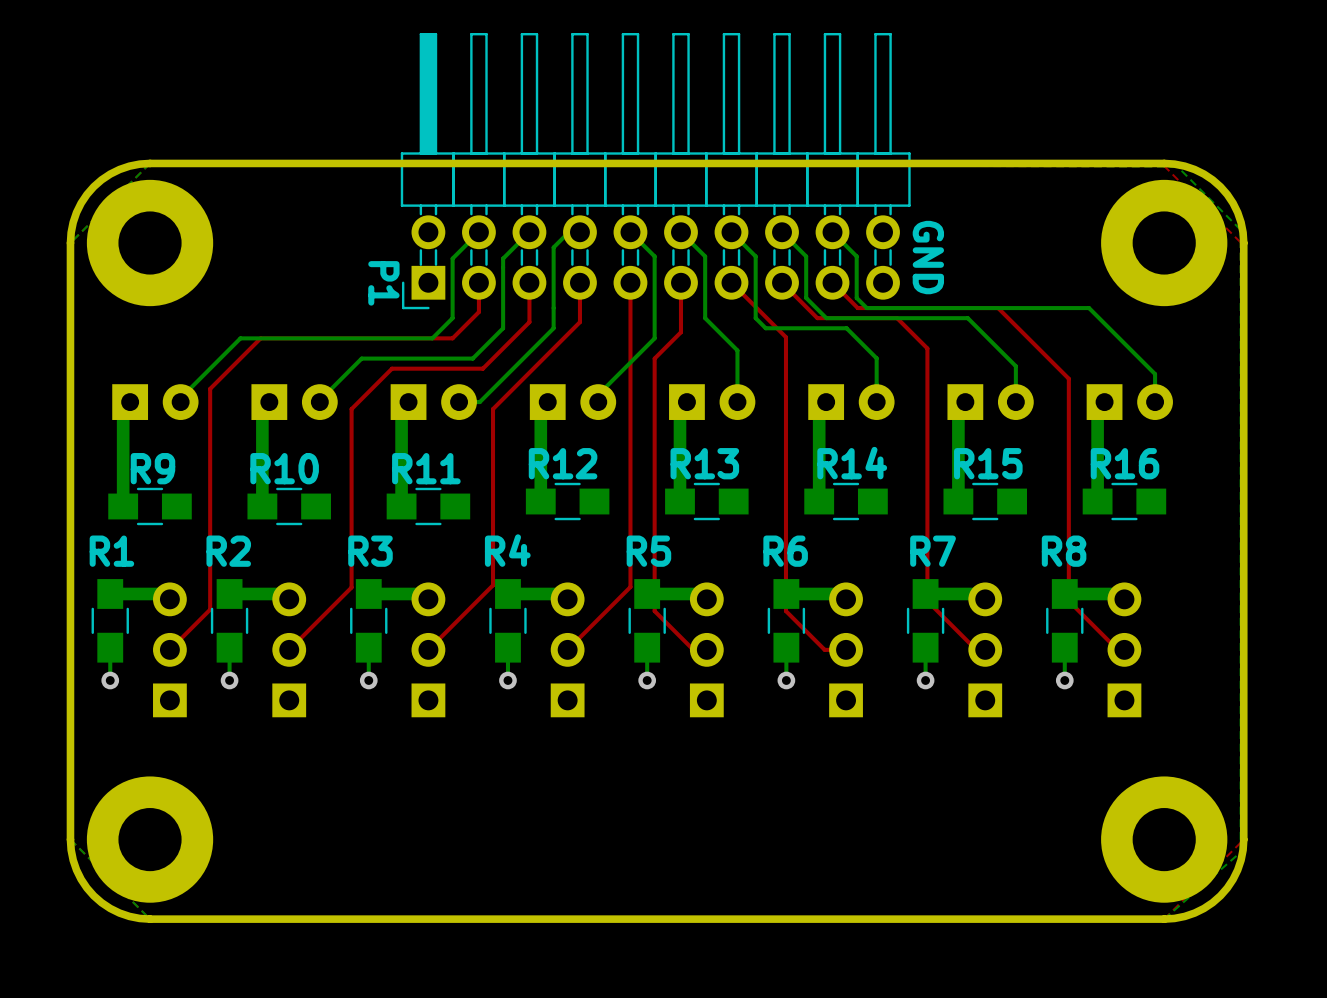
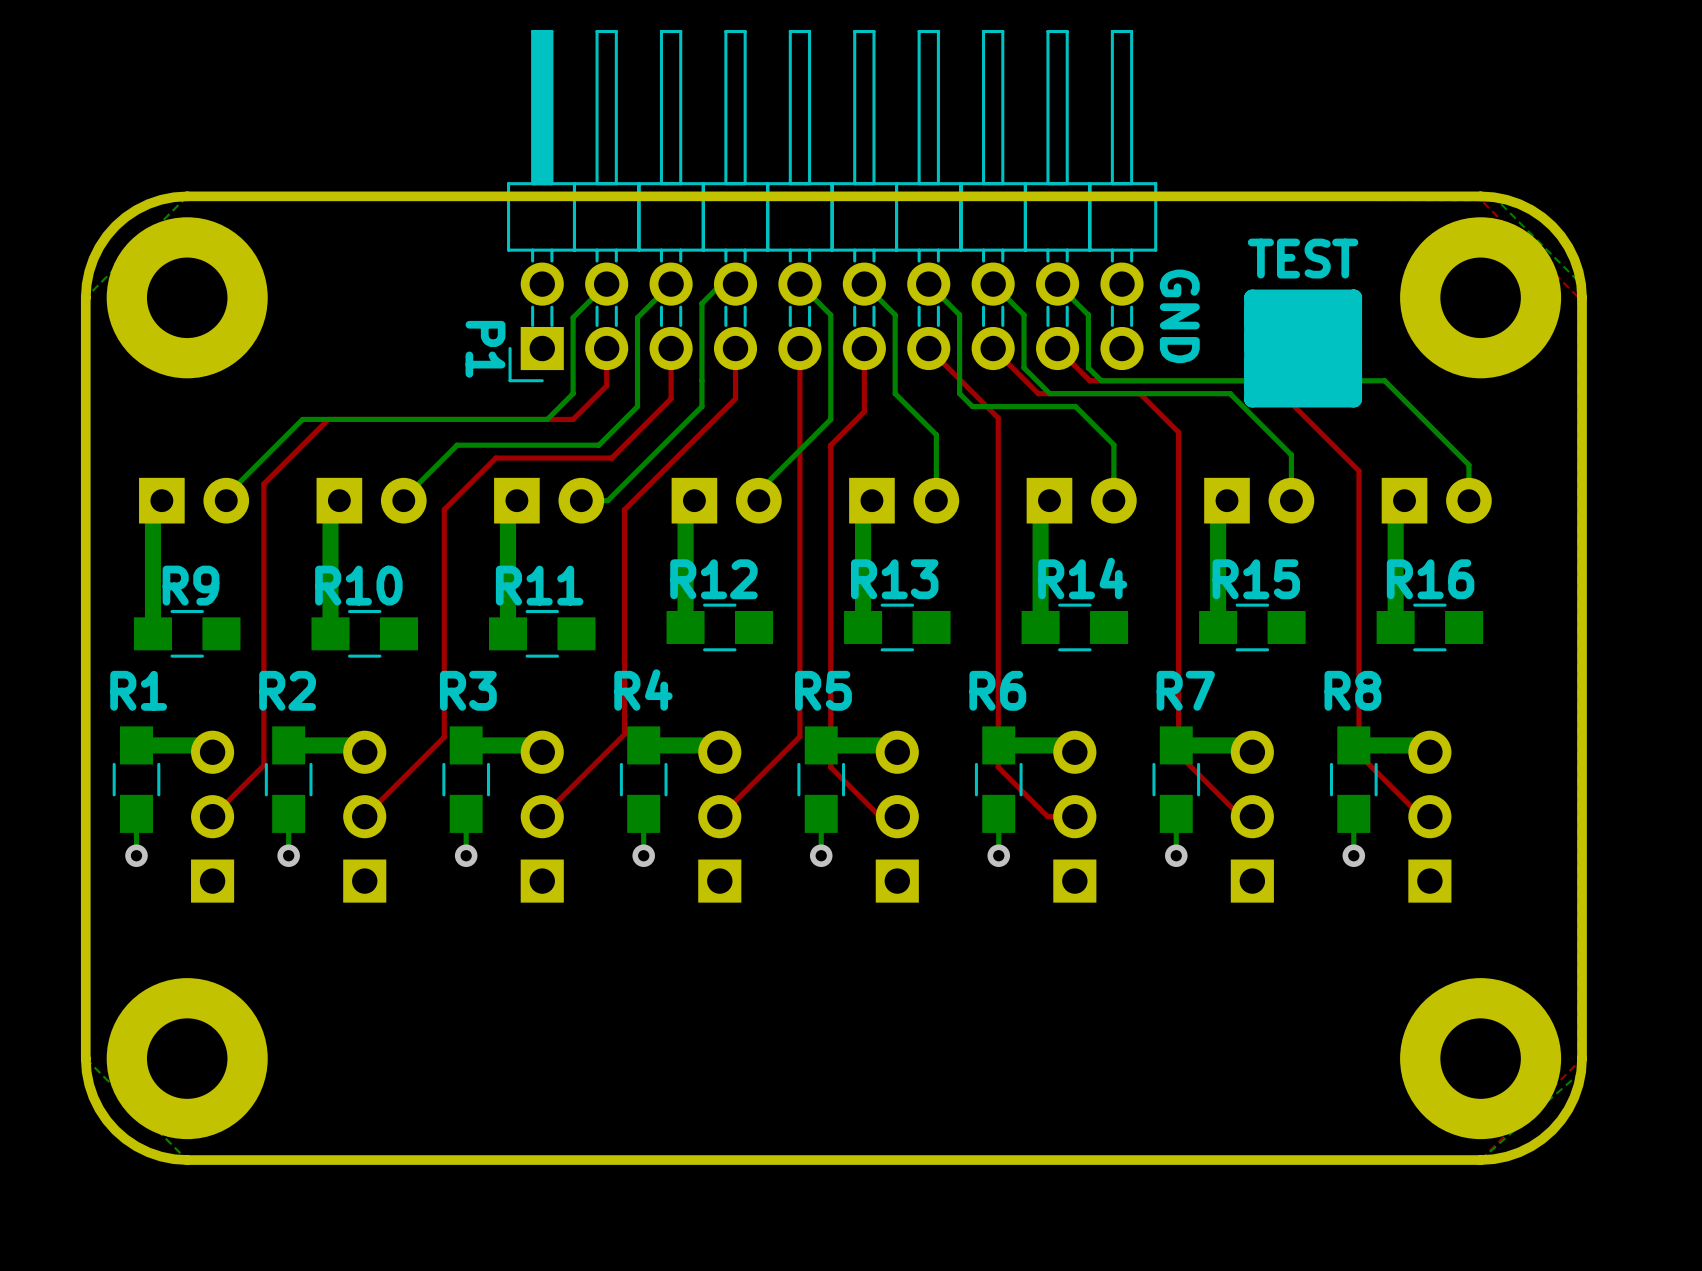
TEST: none -> (1303, 348)

